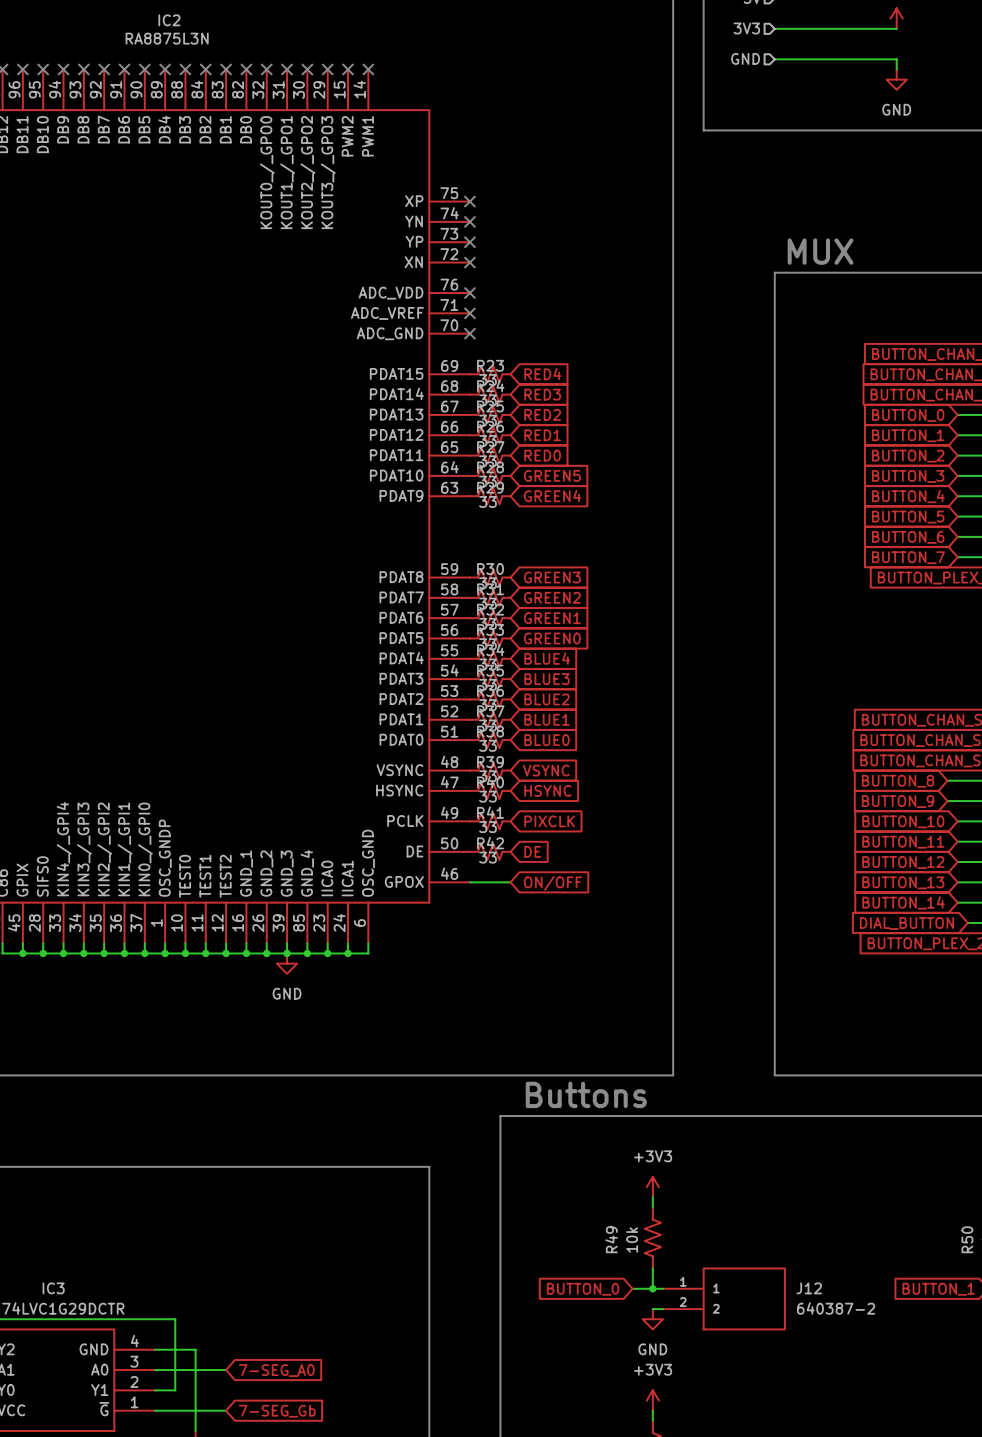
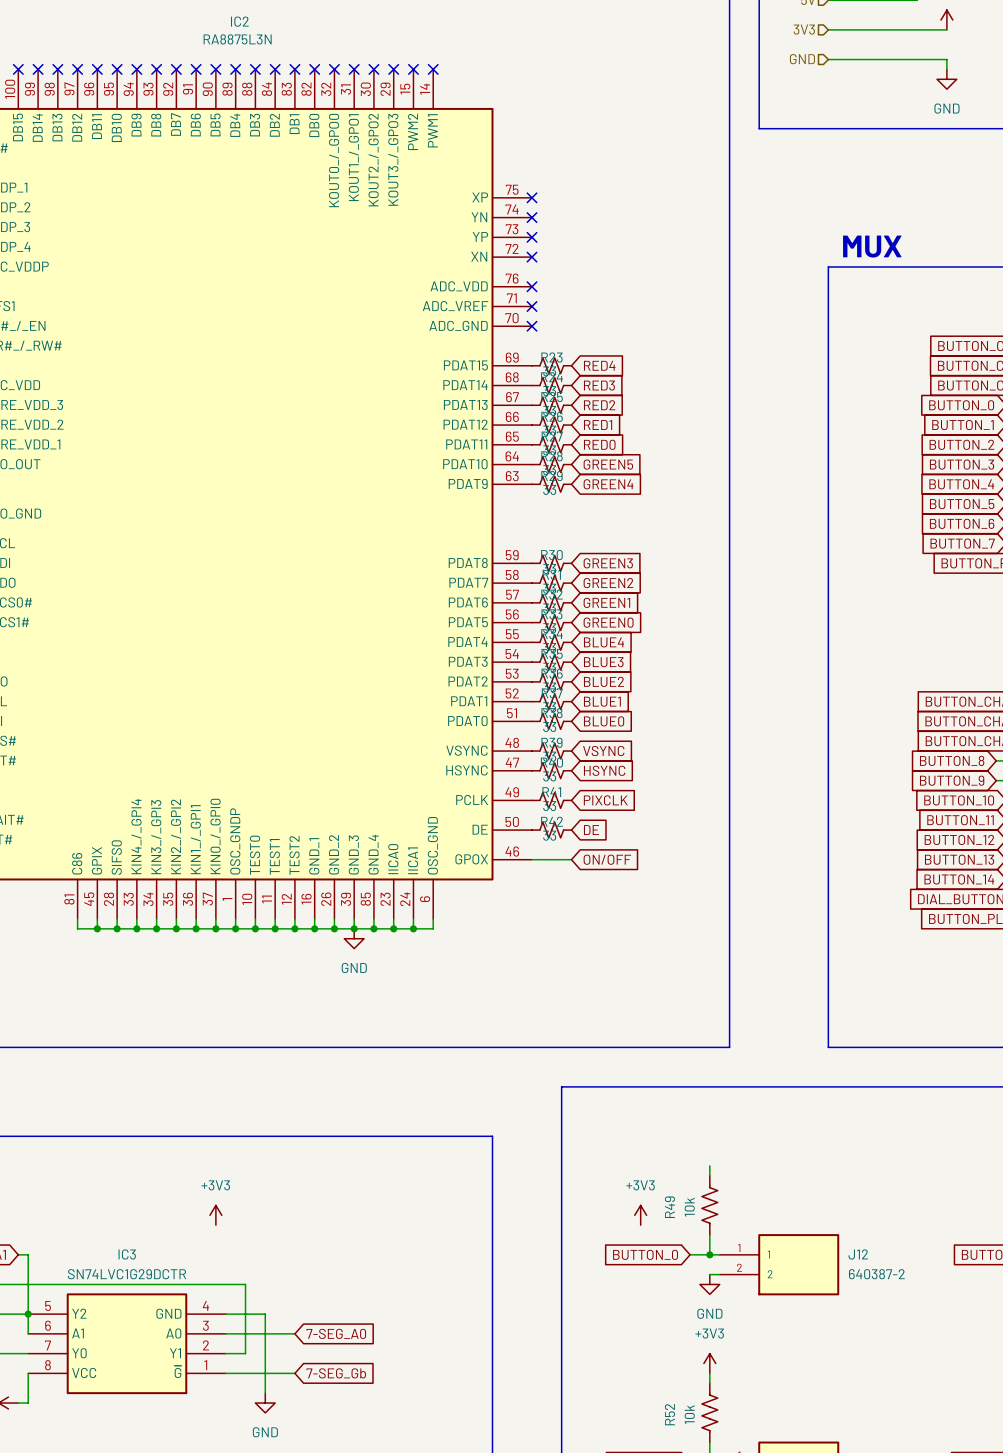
text: Buttons (586, 1094) -> none
power symbol position: +3V3 (652, 1187) -> +3V3 (640, 1215)
power symbol: none -> +3V3 (215, 1215)

